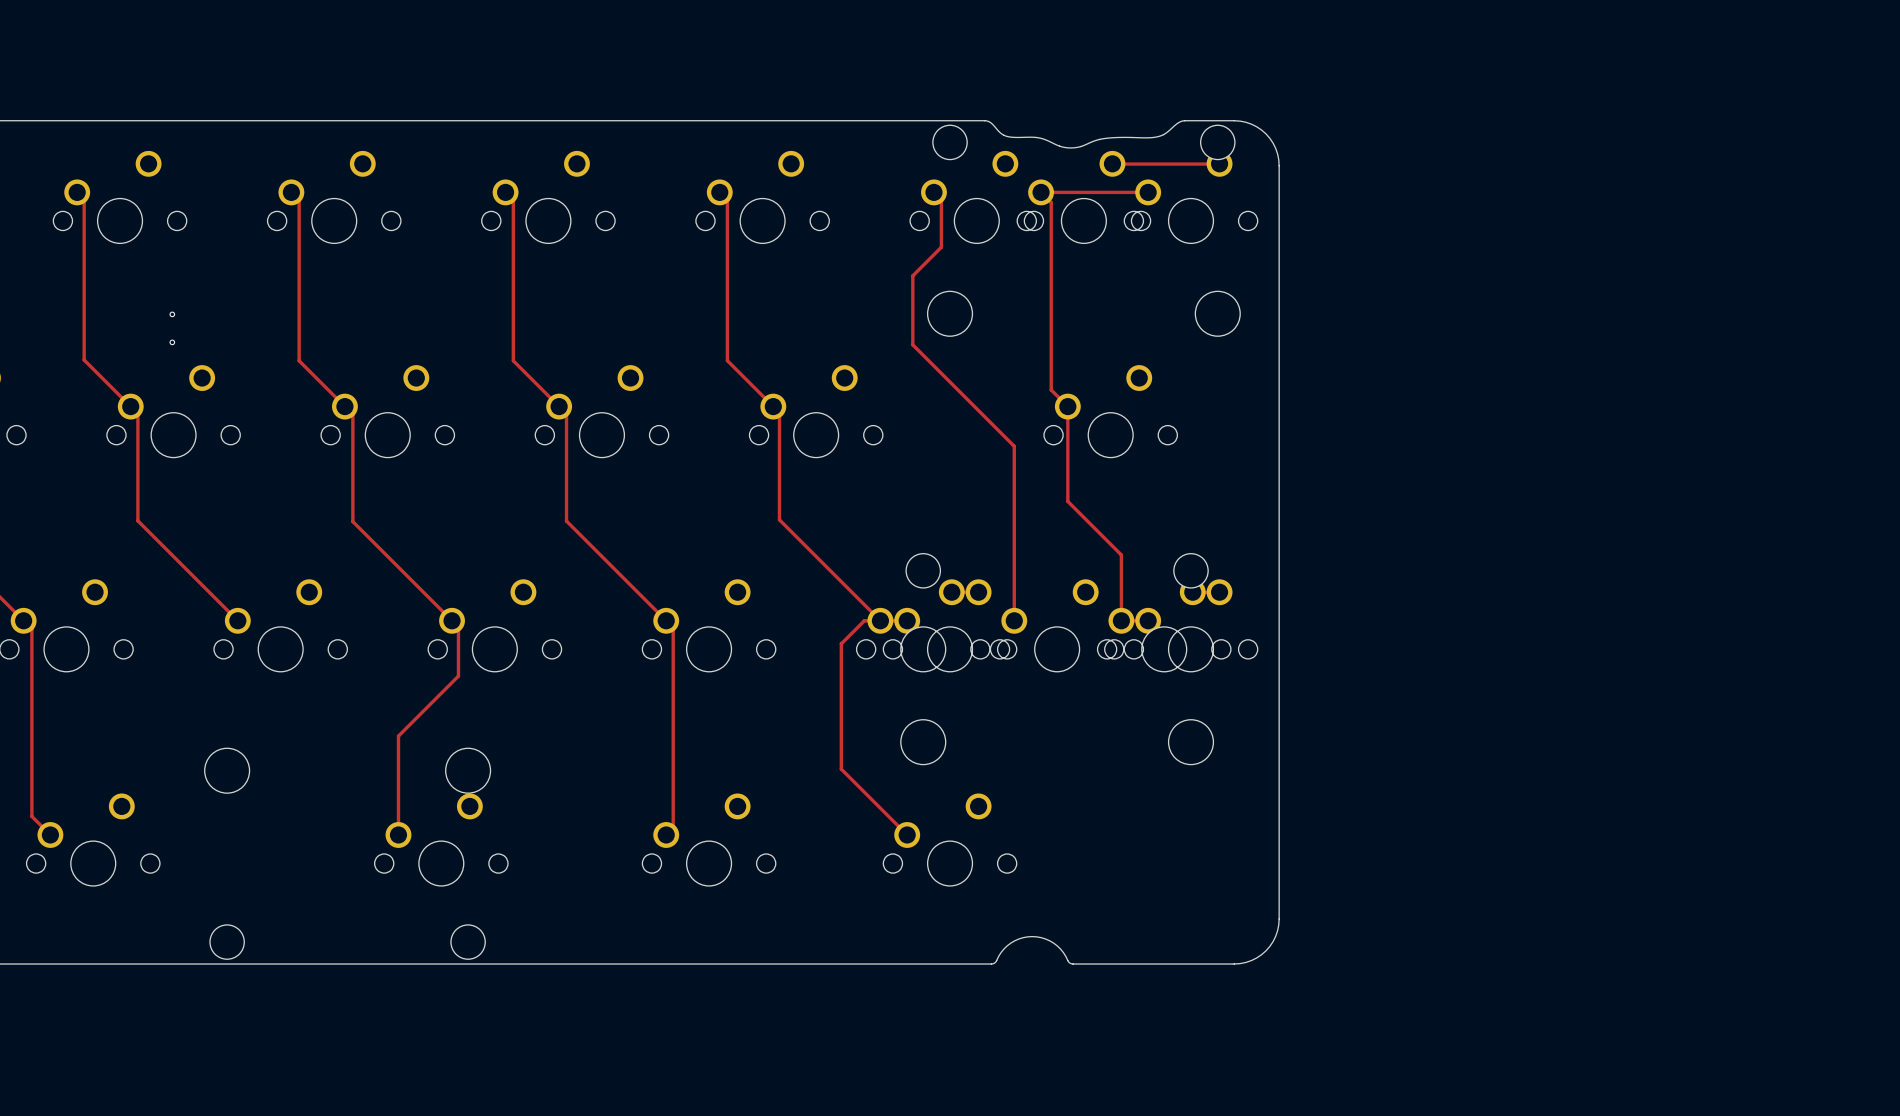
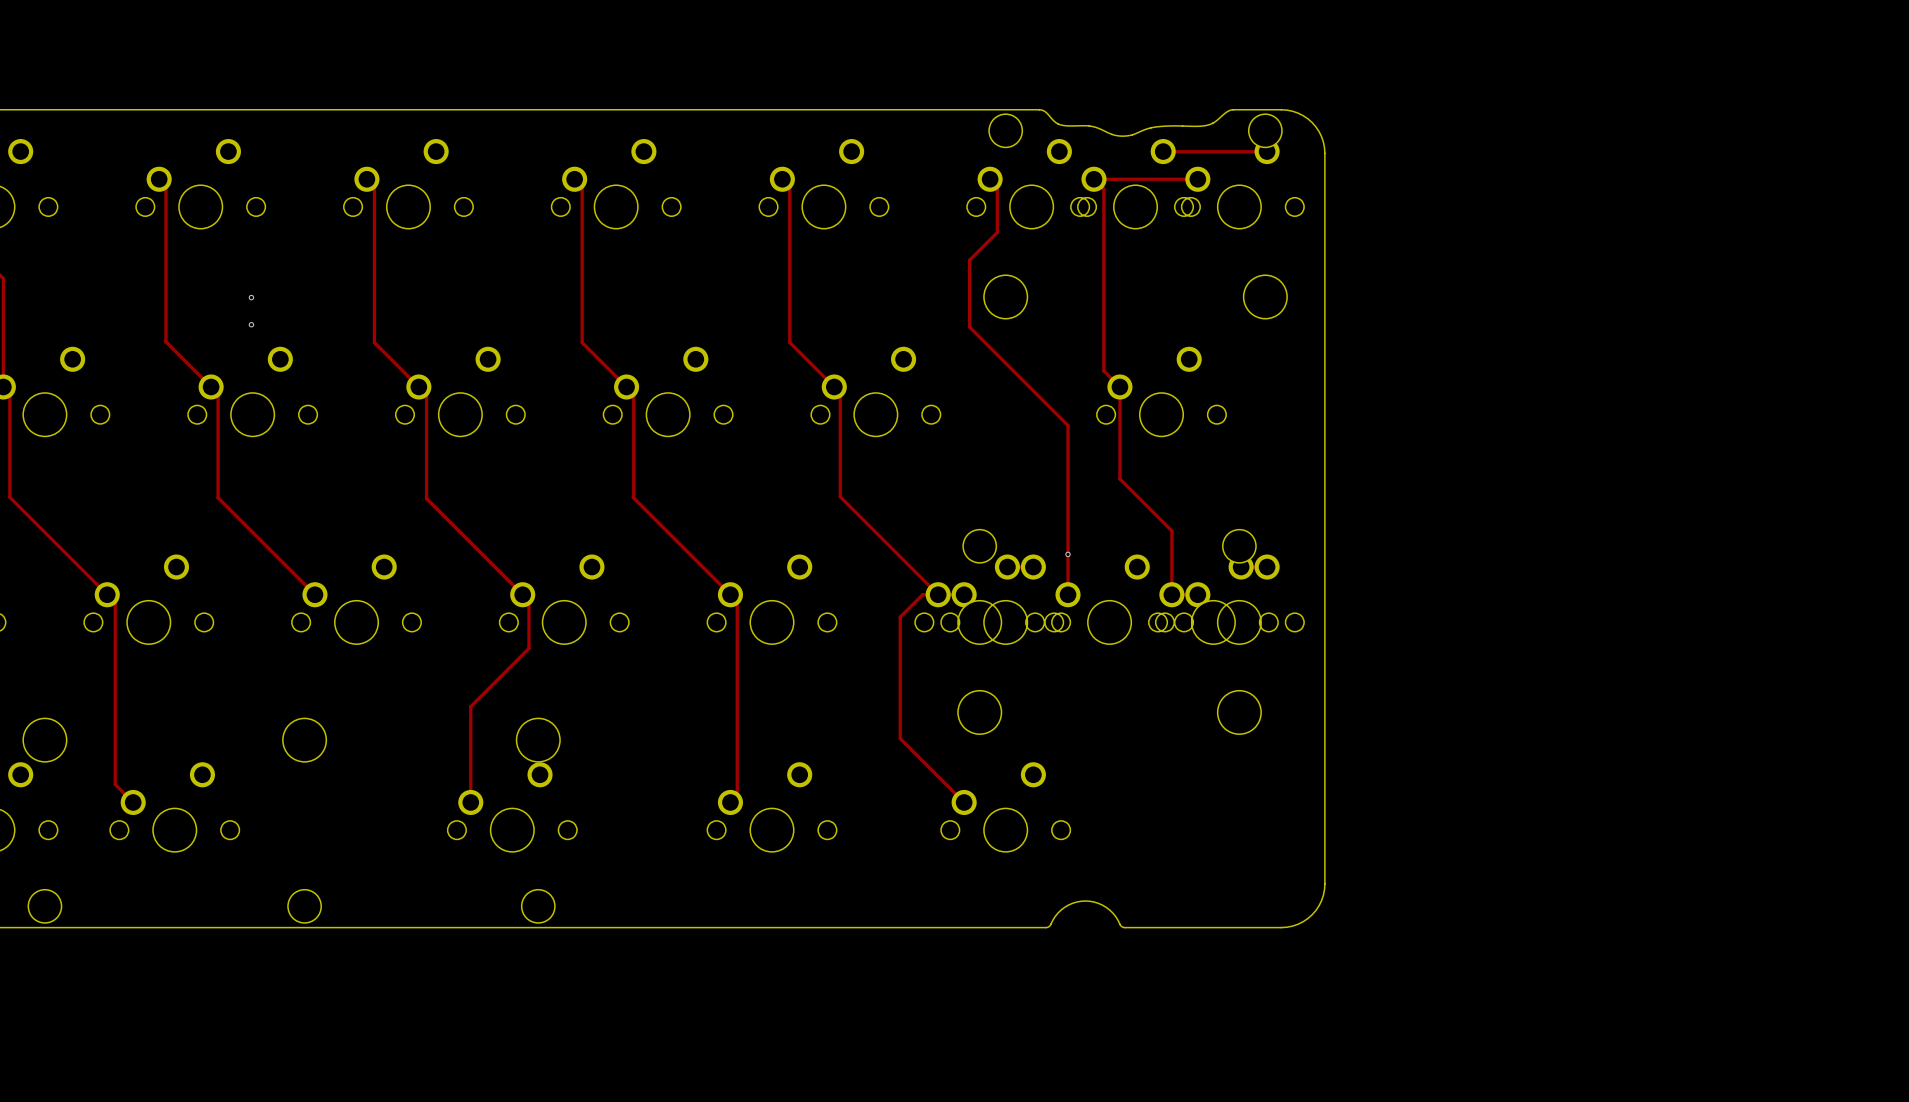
via: none -> (1068, 554)

